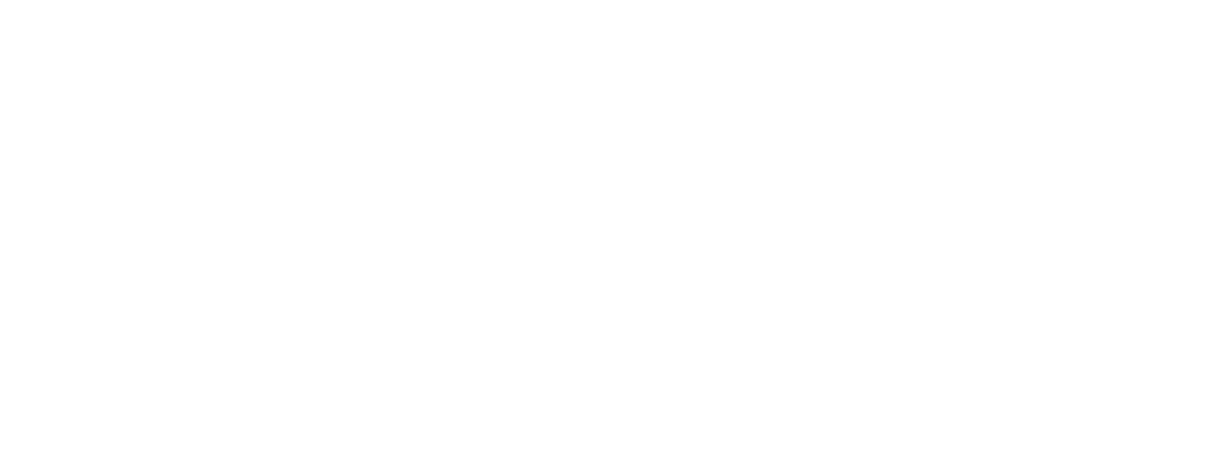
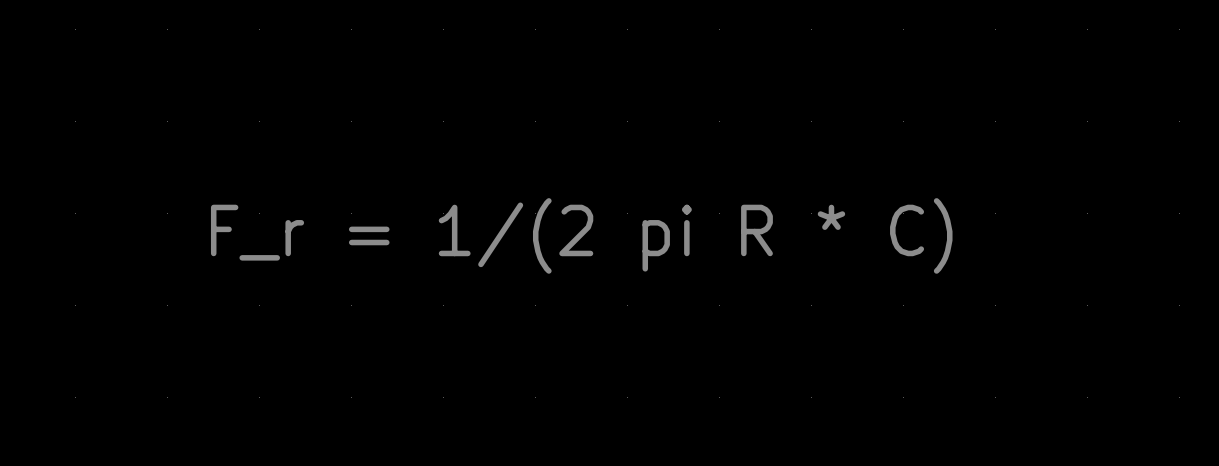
text: none -> F_r = 1/(2 pi R * C) (581, 235)

